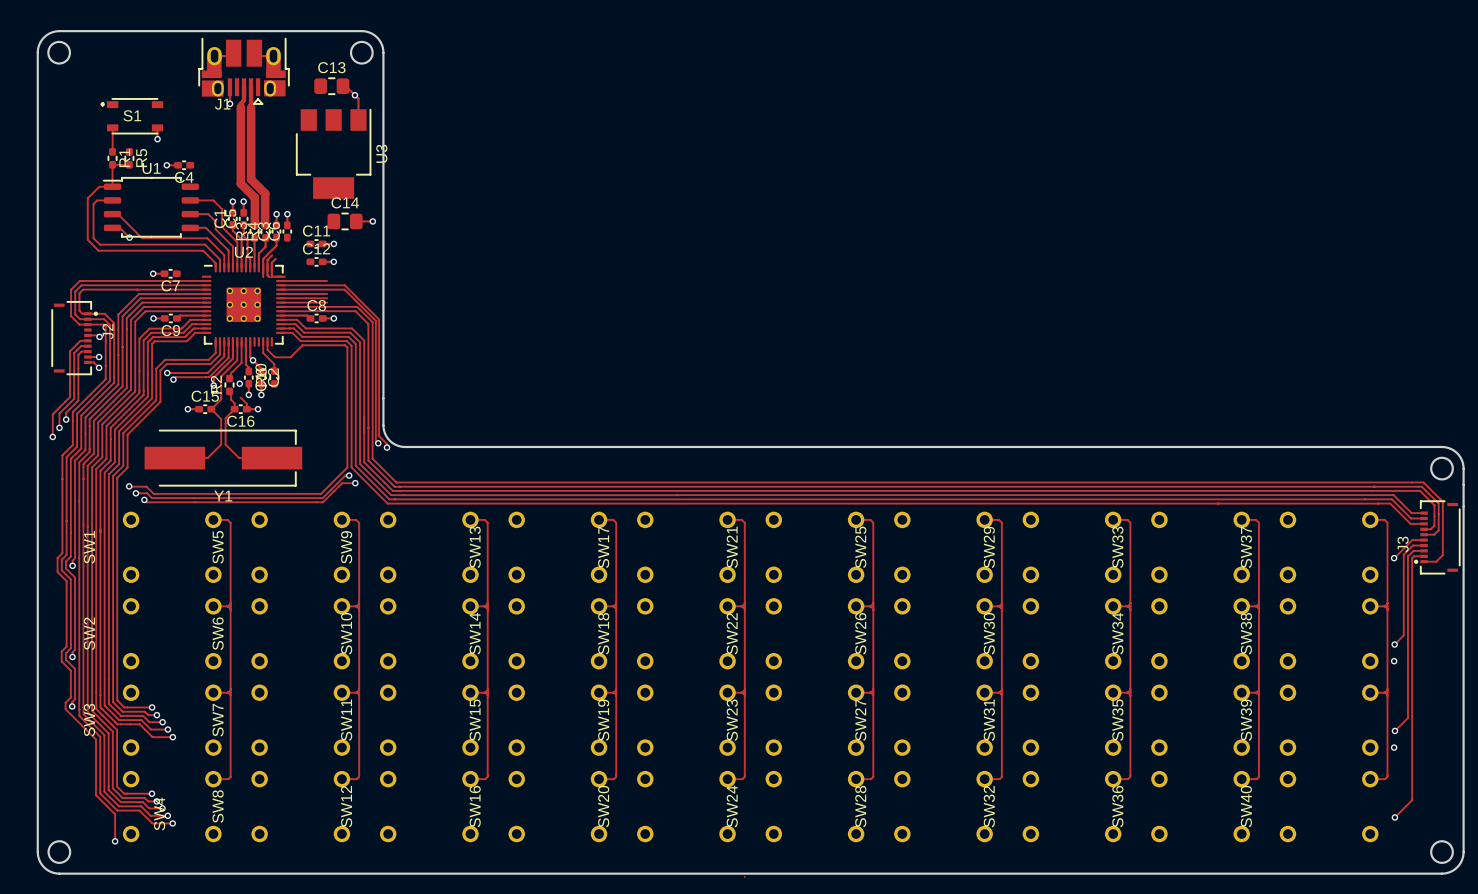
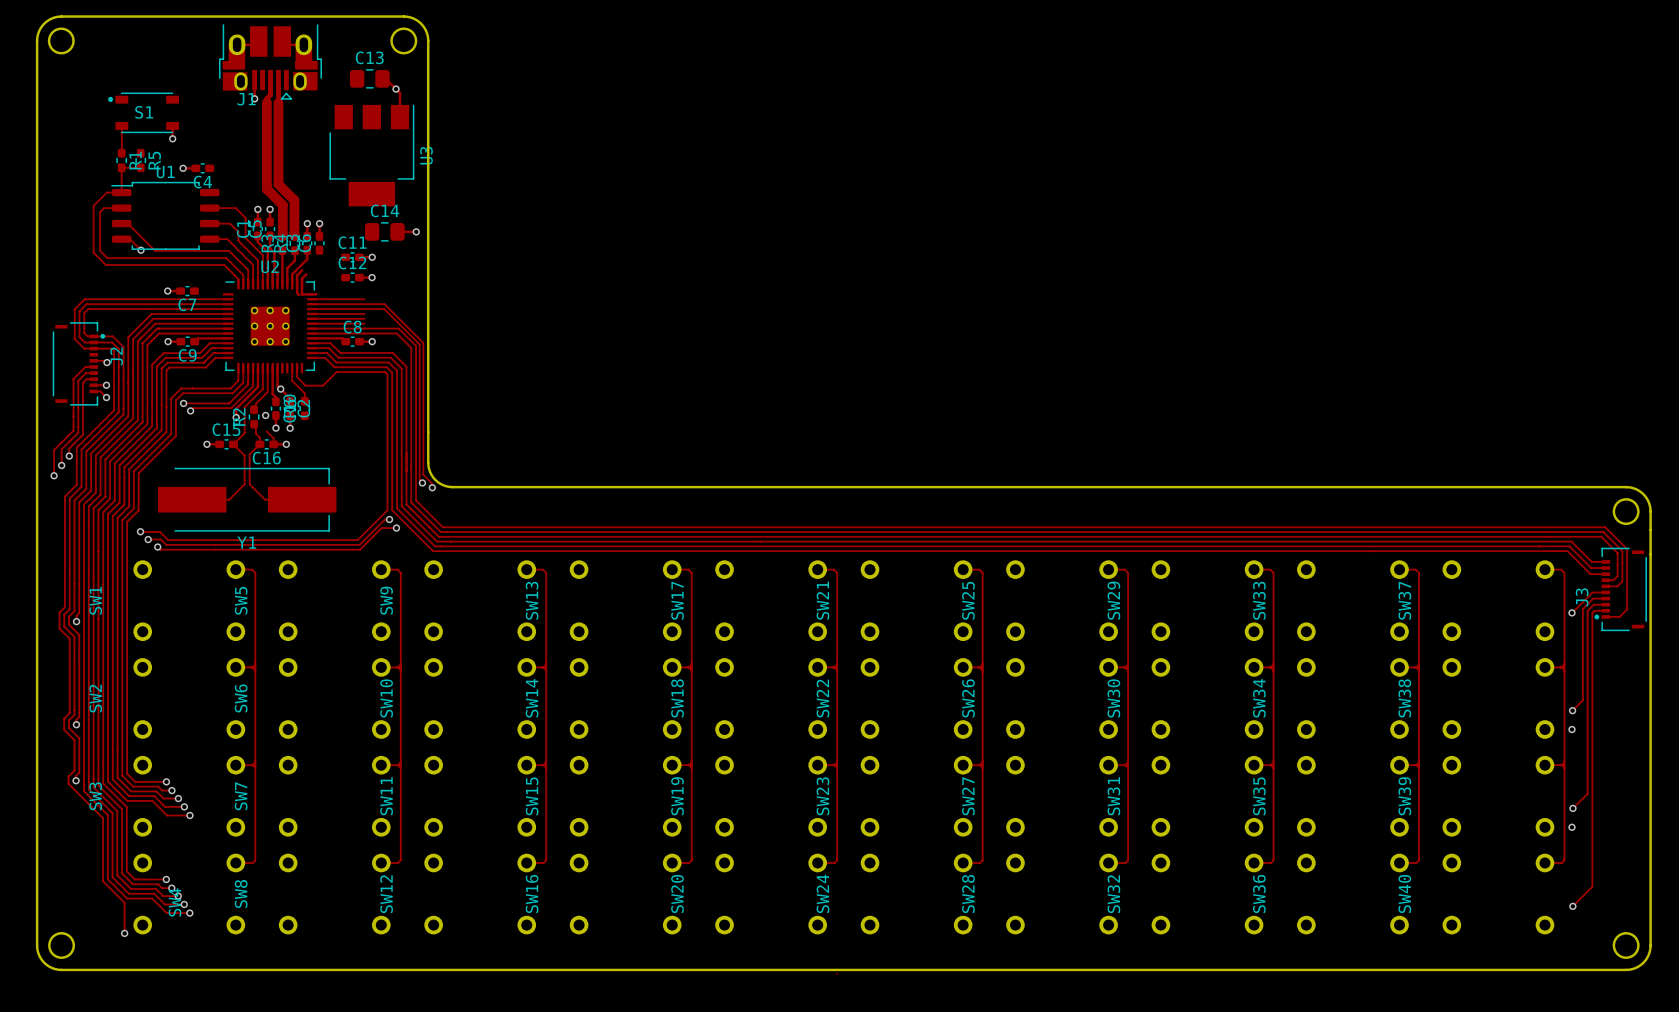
track: (263, 267) (263, 277) -> none

